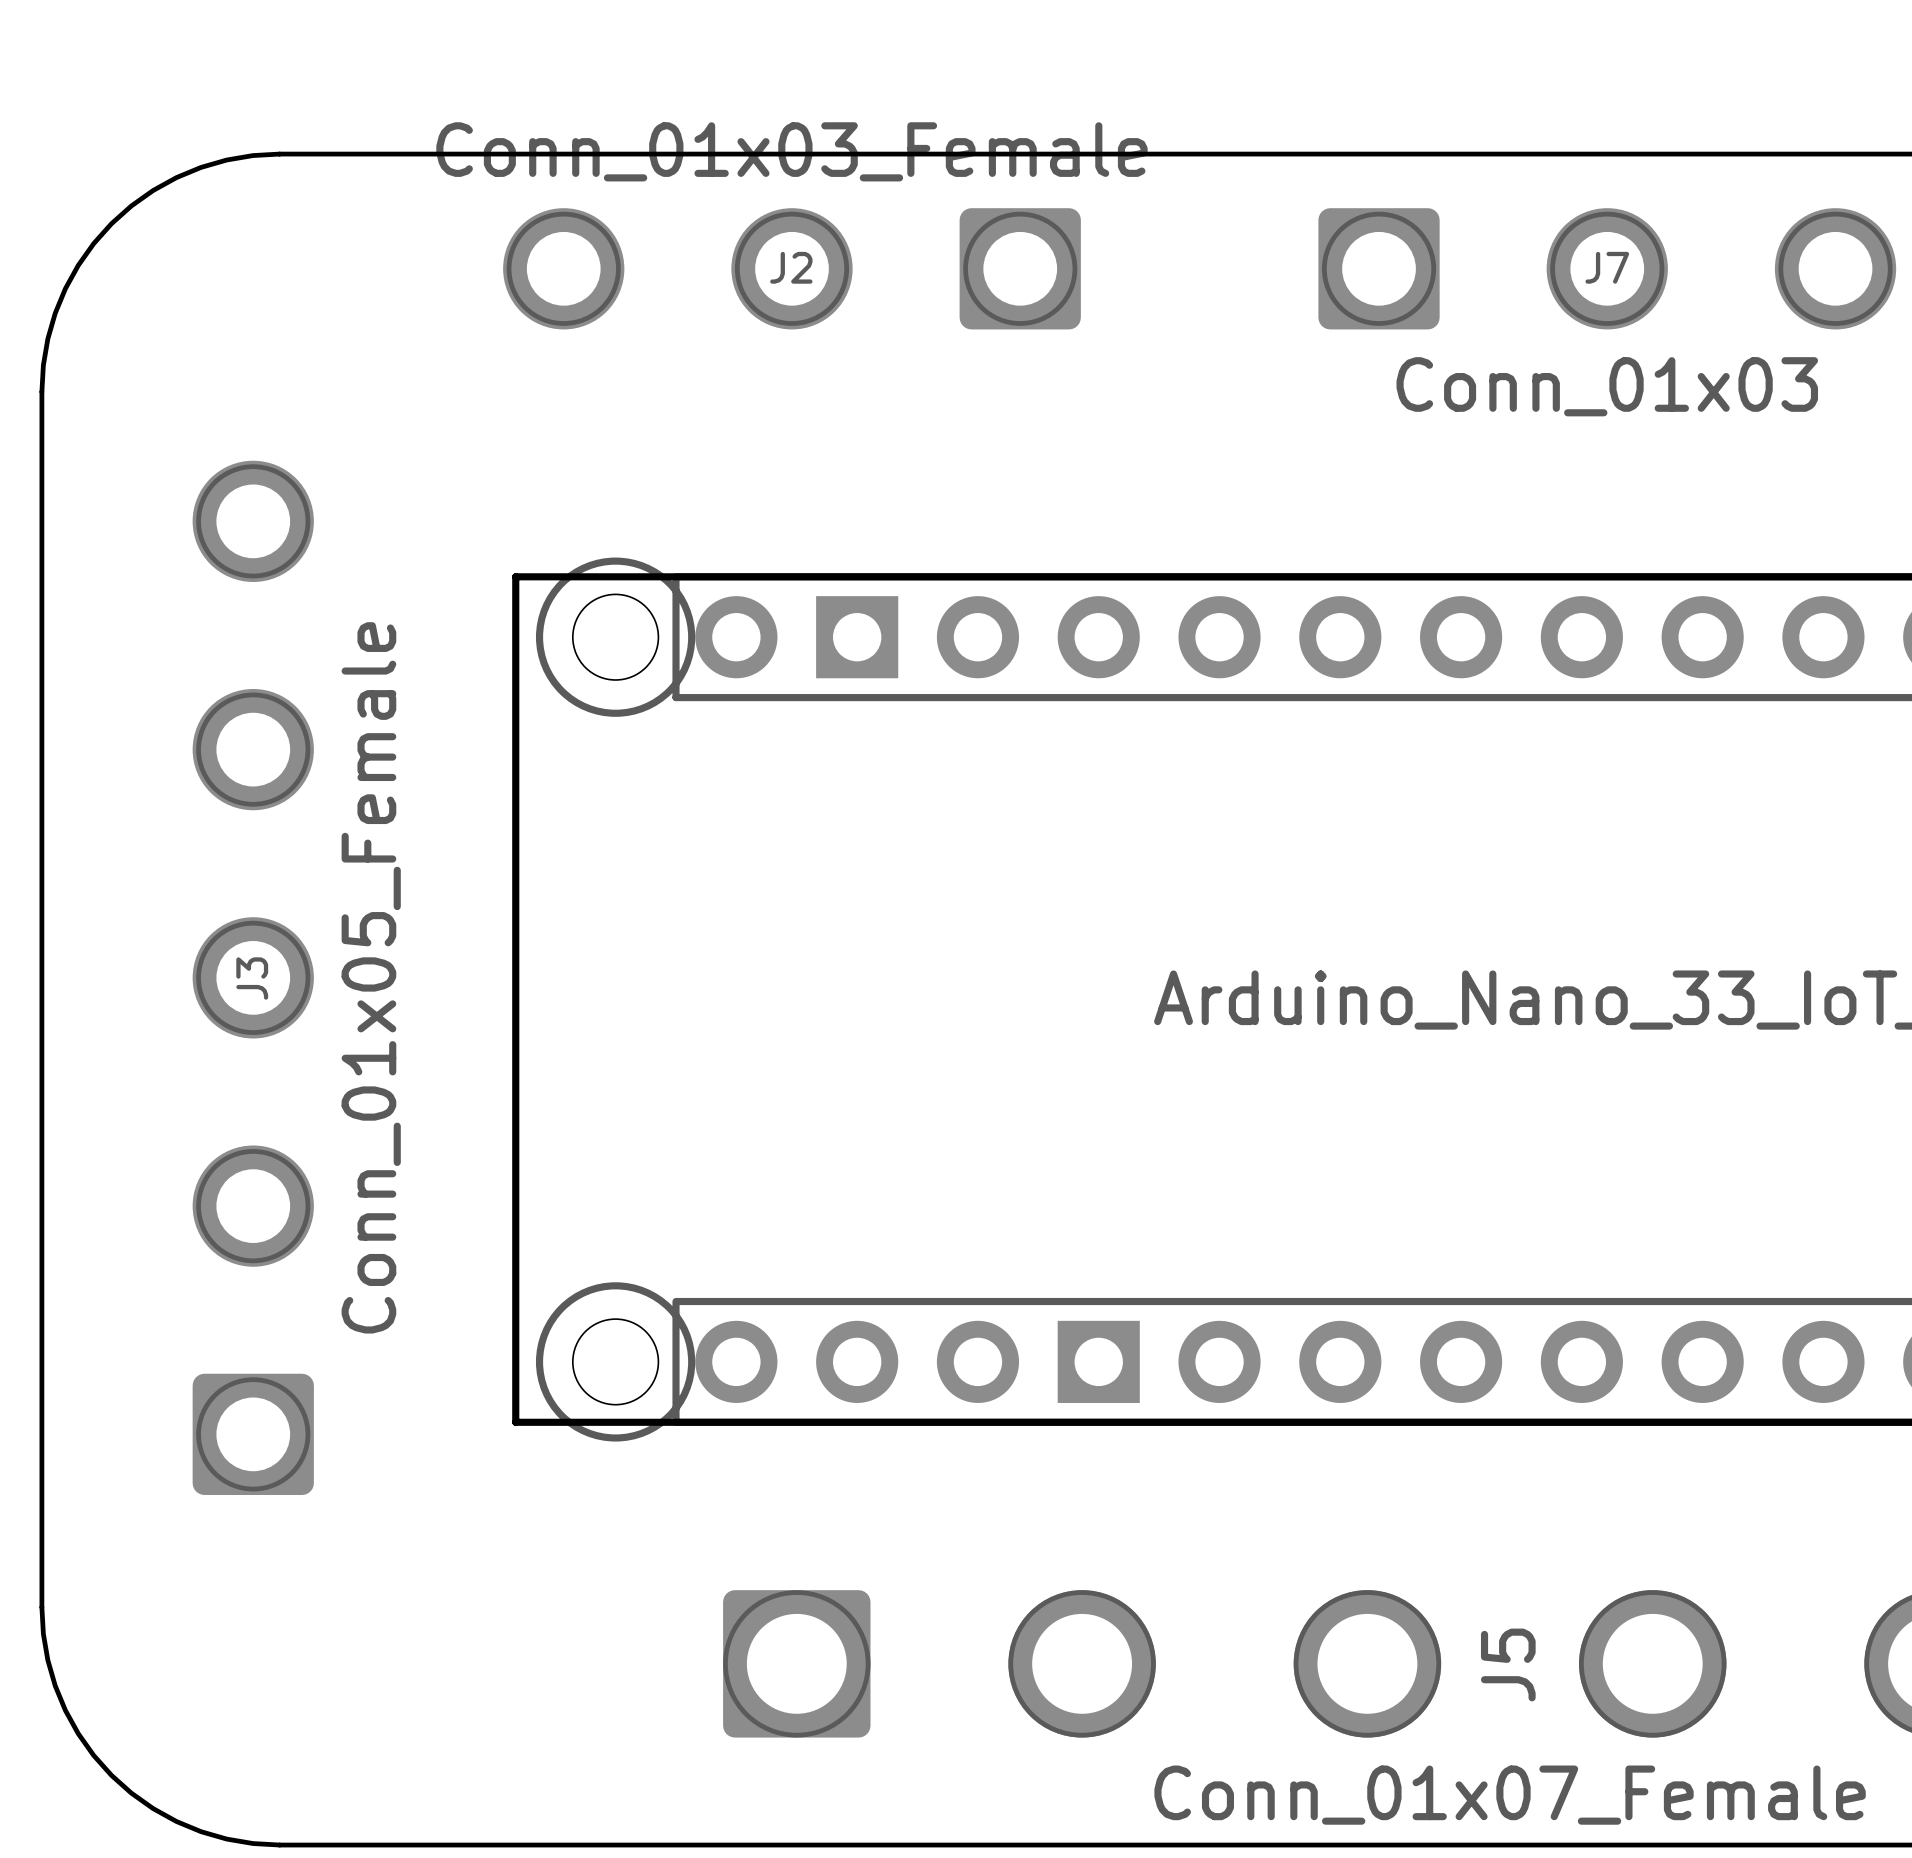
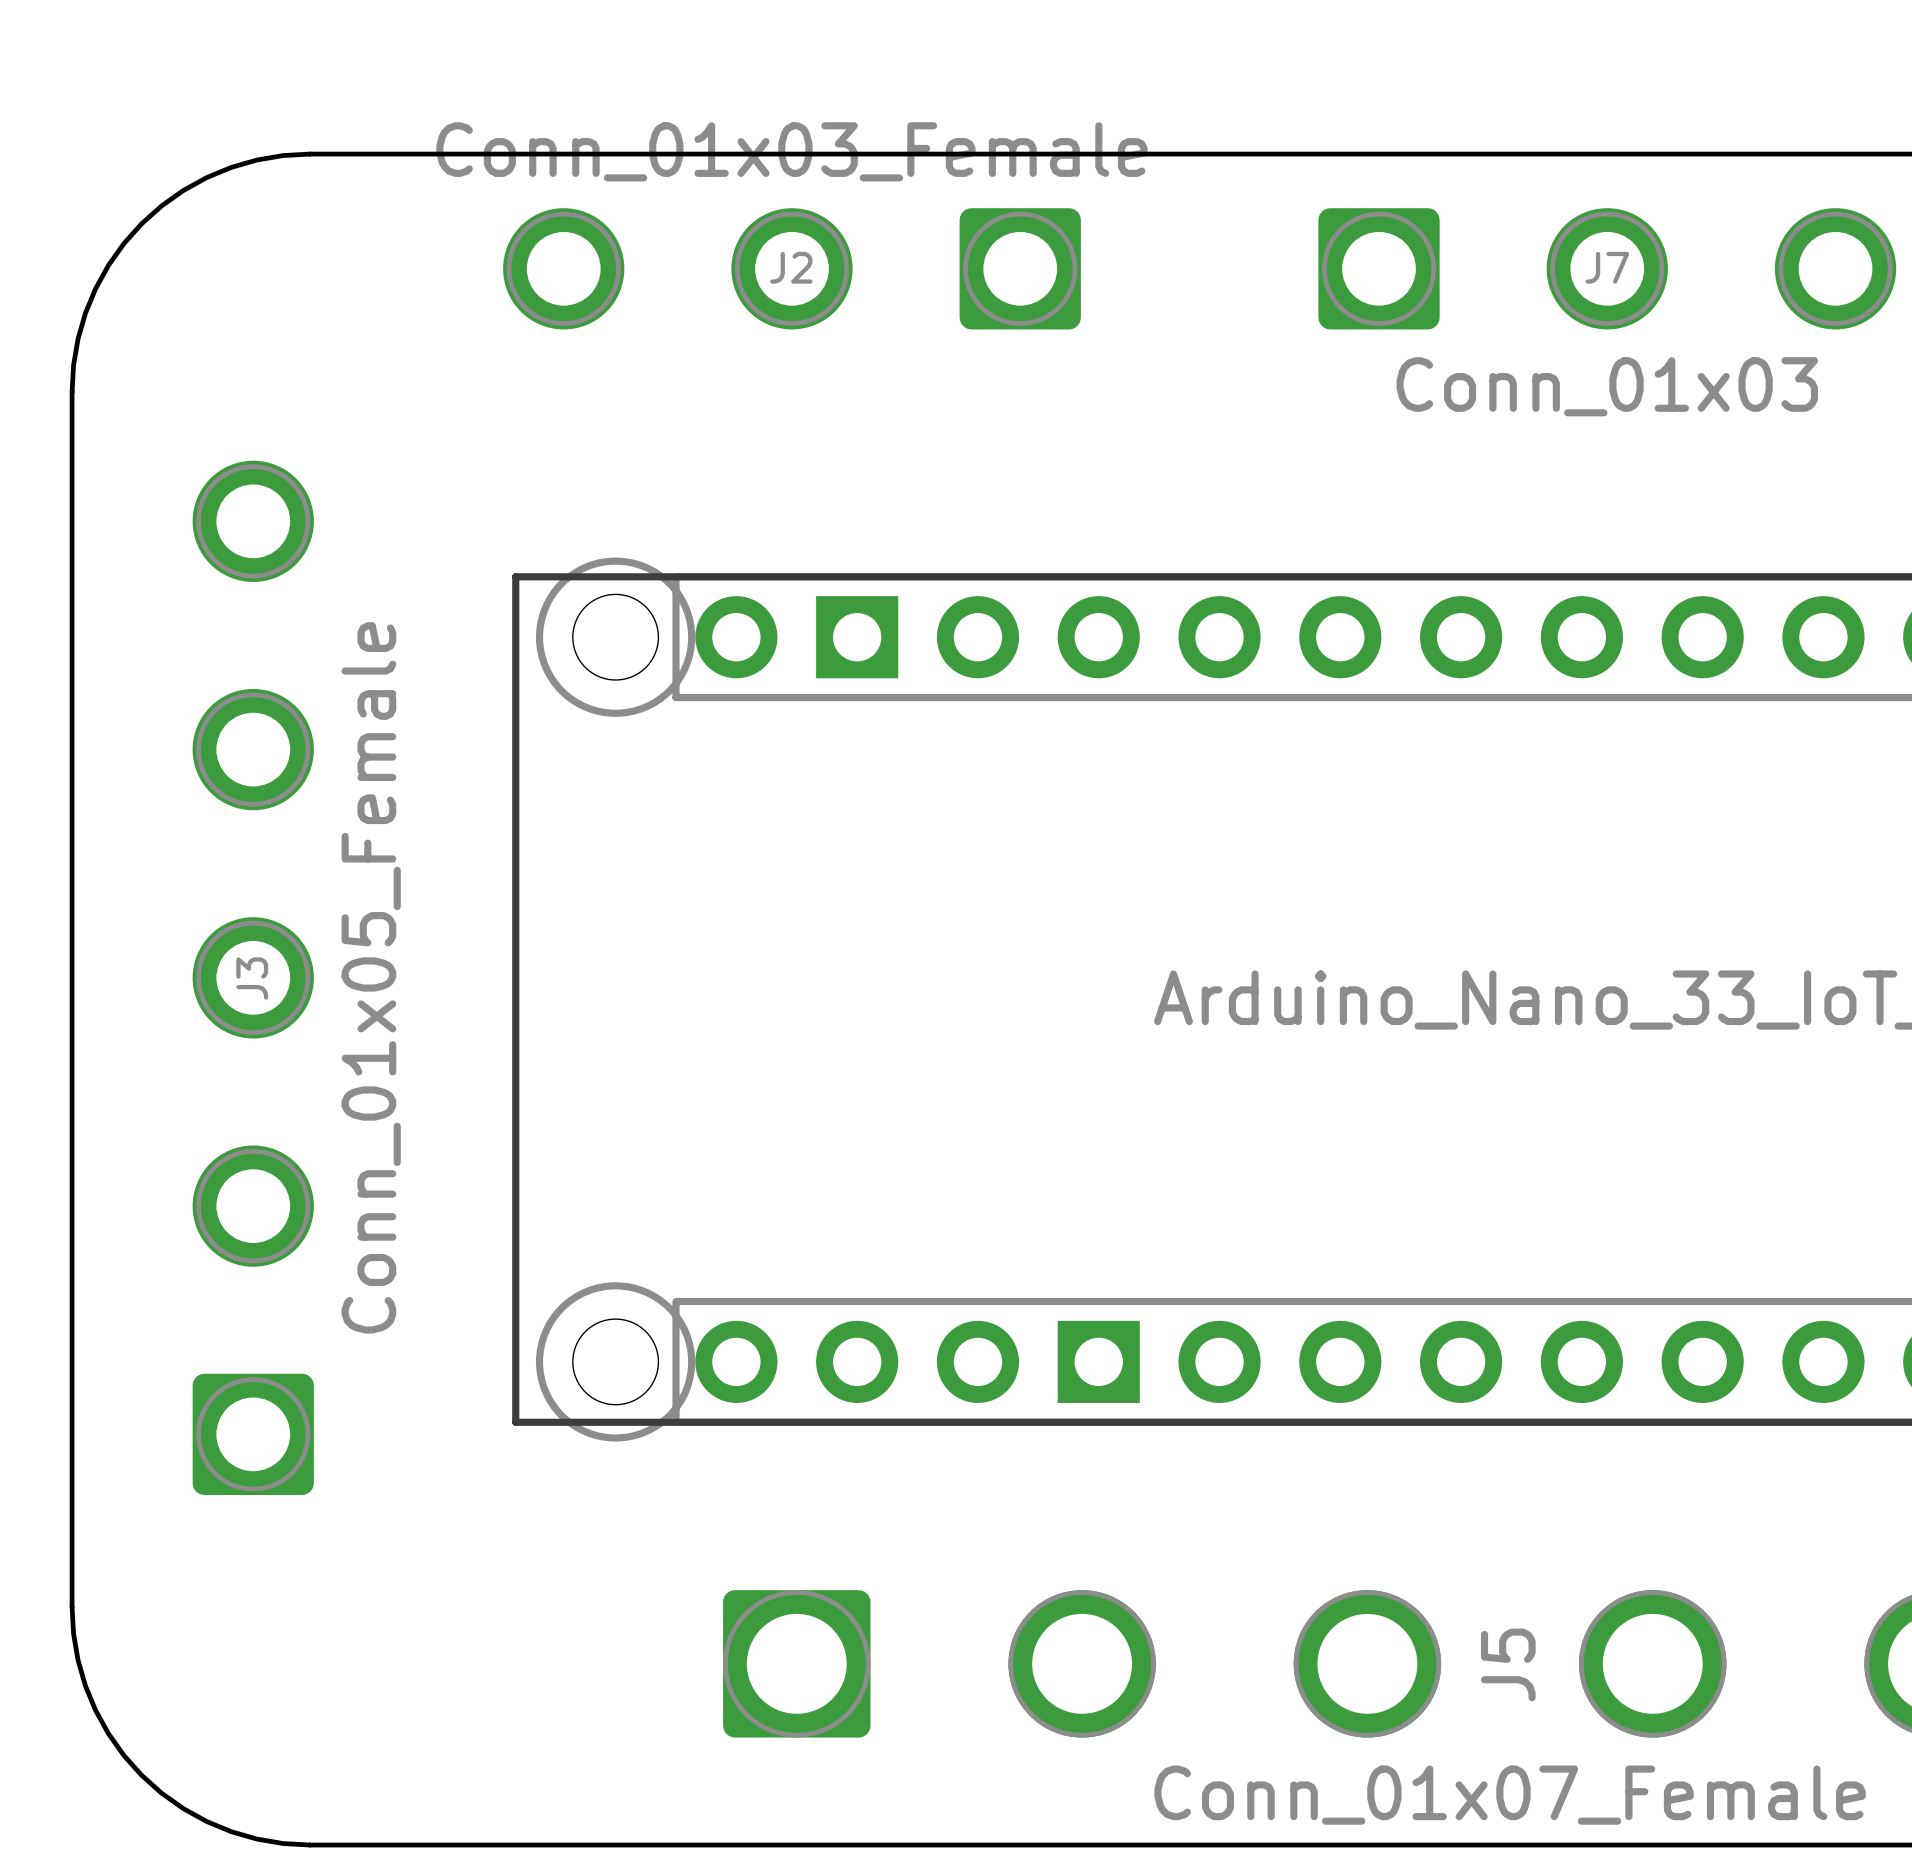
board edge: (309, 154) (253, 155) (201, 167) (153, 190) (131, 205) (93, 243) (65, 288) (47, 338) (41, 391) (41, 1607) (47, 1660) (65, 1710) (78, 1733) (111, 1775) (153, 1808) (201, 1831) (226, 1839) (253, 1843) (309, 1845) -> (309, 154) (283, 155) (231, 167) (183, 190) (141, 223) (123, 243) (95, 288) (78, 338) (72, 391) (73, 1633) (85, 1685) (95, 1710) (123, 1755) (141, 1775) (183, 1808) (231, 1831) (283, 1843) (309, 1845)

